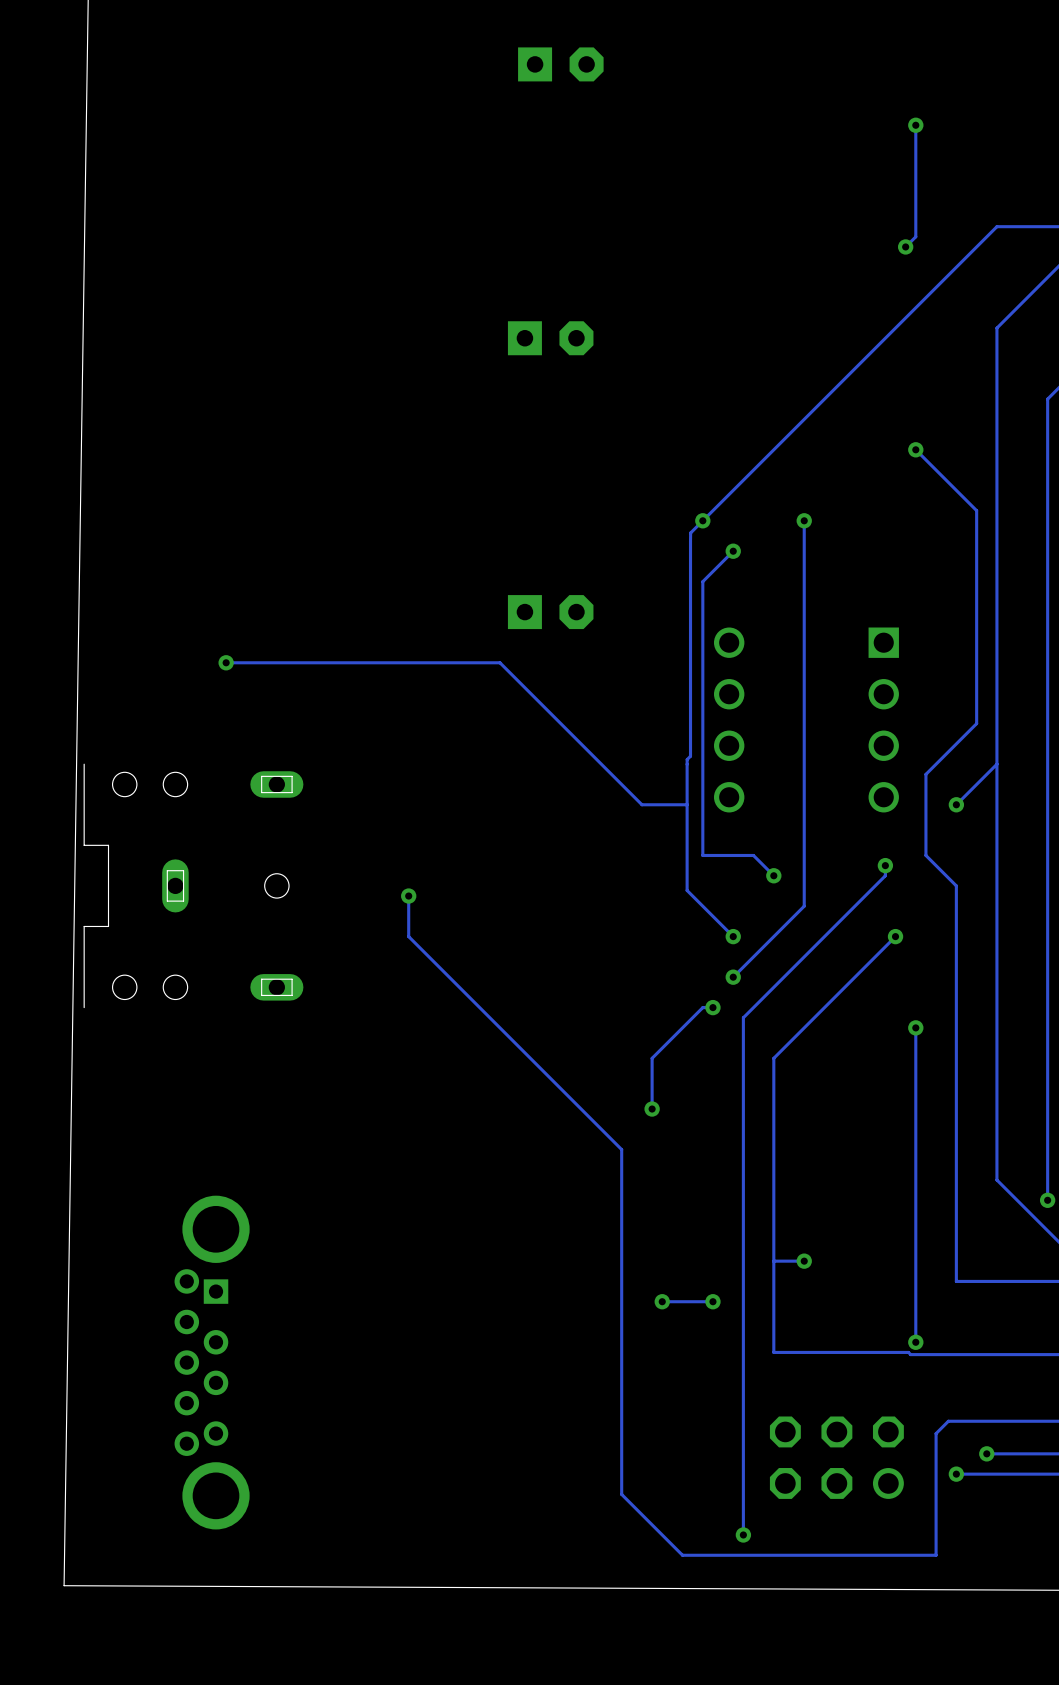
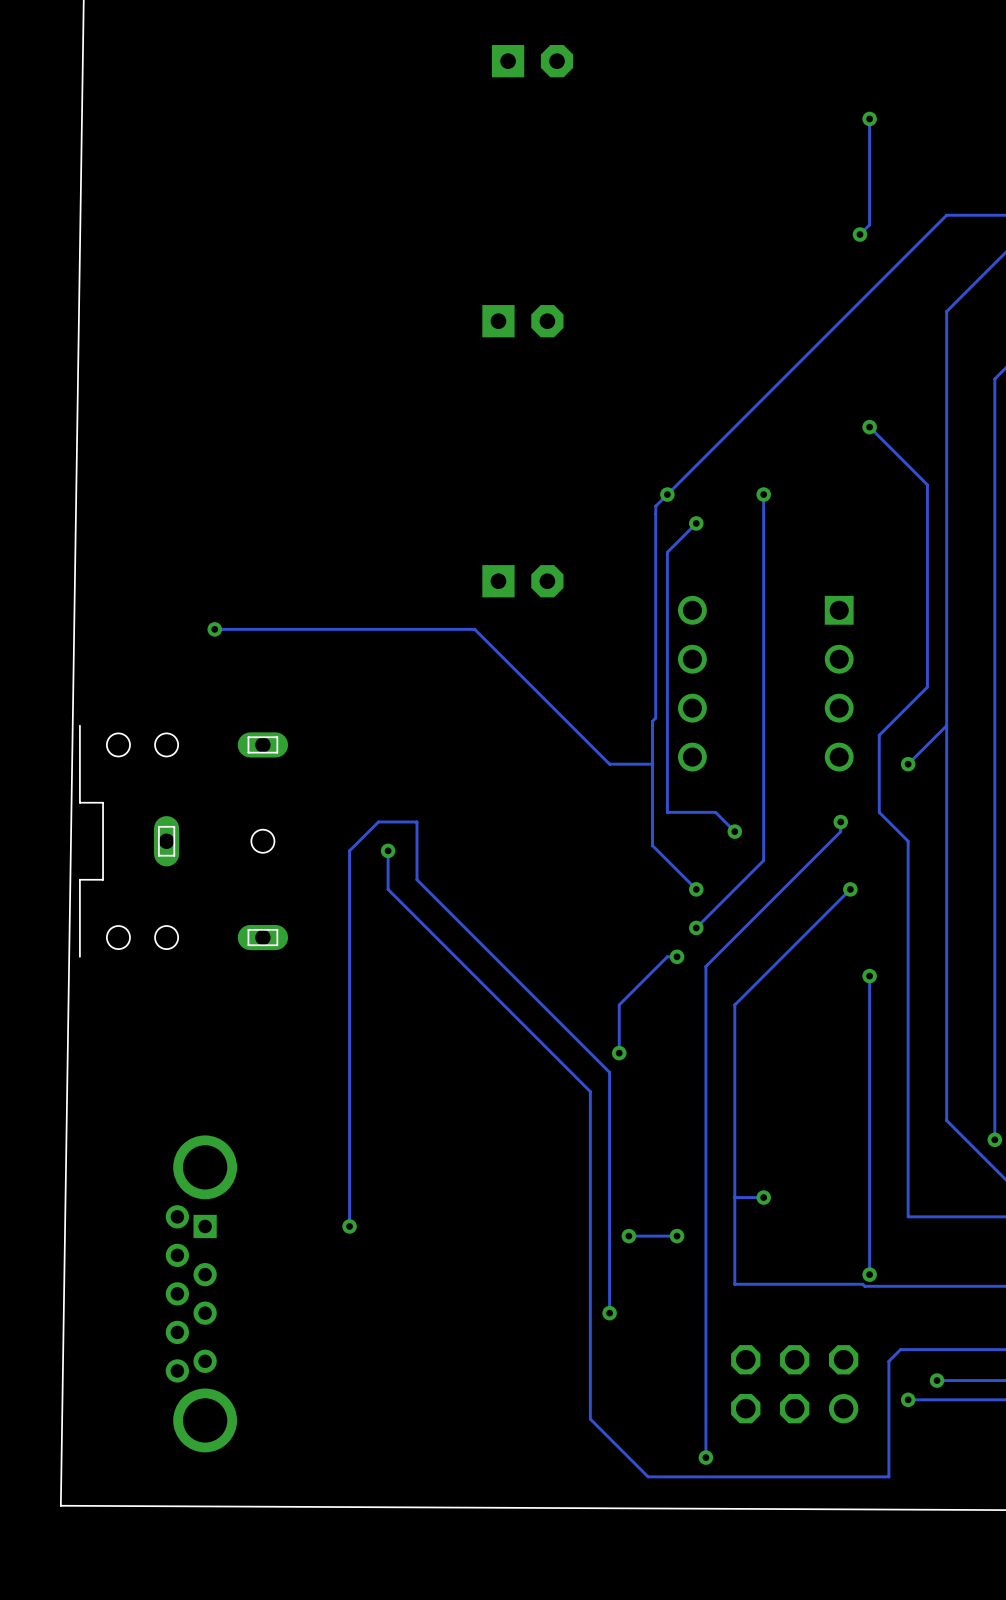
track: none -> (349, 1226) (349, 850) (378, 821) (416, 821) (416, 879) (609, 1072) (609, 1313)
via: none -> (349, 1226)
via: none -> (609, 1313)

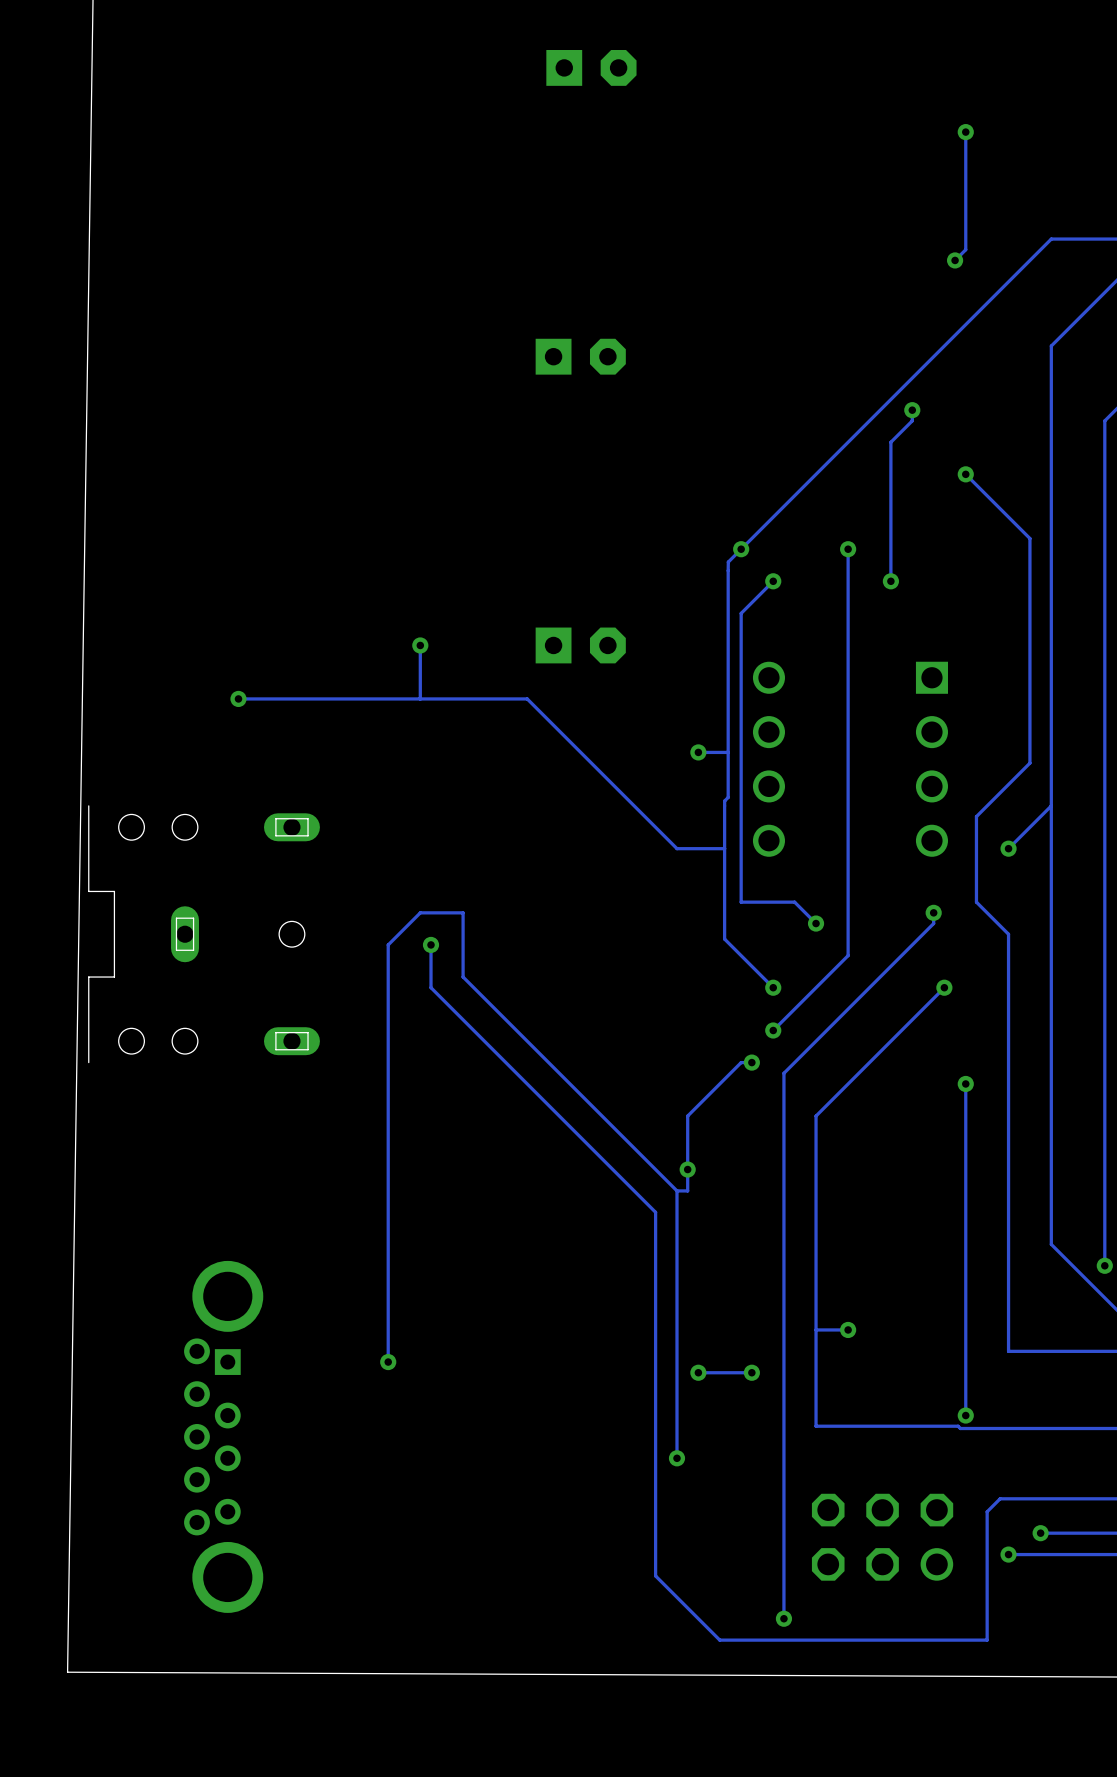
track: none -> (912, 410) (912, 420) (890, 442) (890, 581)
via: none -> (912, 410)
via: none -> (890, 581)
track: none -> (420, 645) (420, 698)
via: none -> (420, 645)
via: none -> (698, 752)
track: none -> (728, 752) (698, 752)
track: none -> (687, 1169) (687, 1190) (676, 1190)

